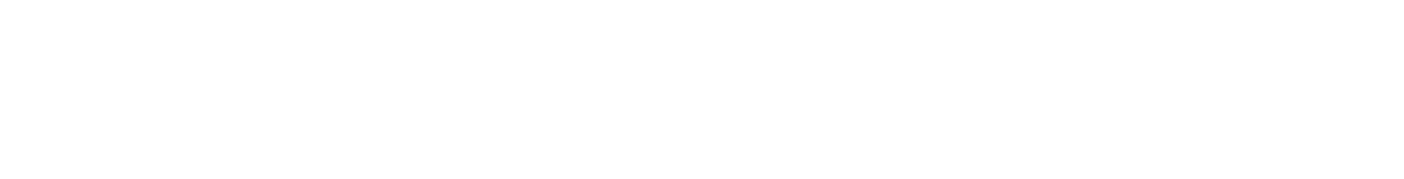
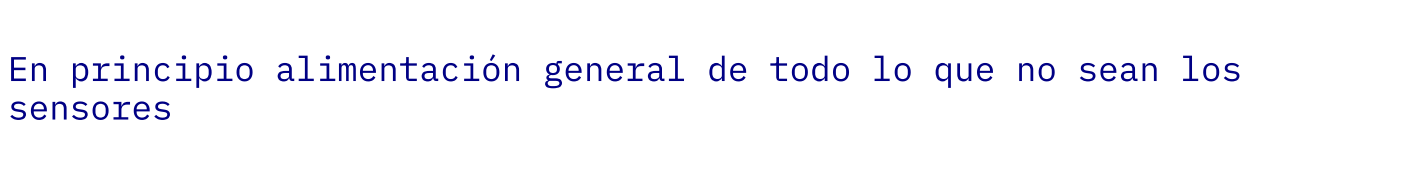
text: none -> En principio alimentación general de todo lo que no sean los (625, 71)
text: none -> sensores (90, 110)

